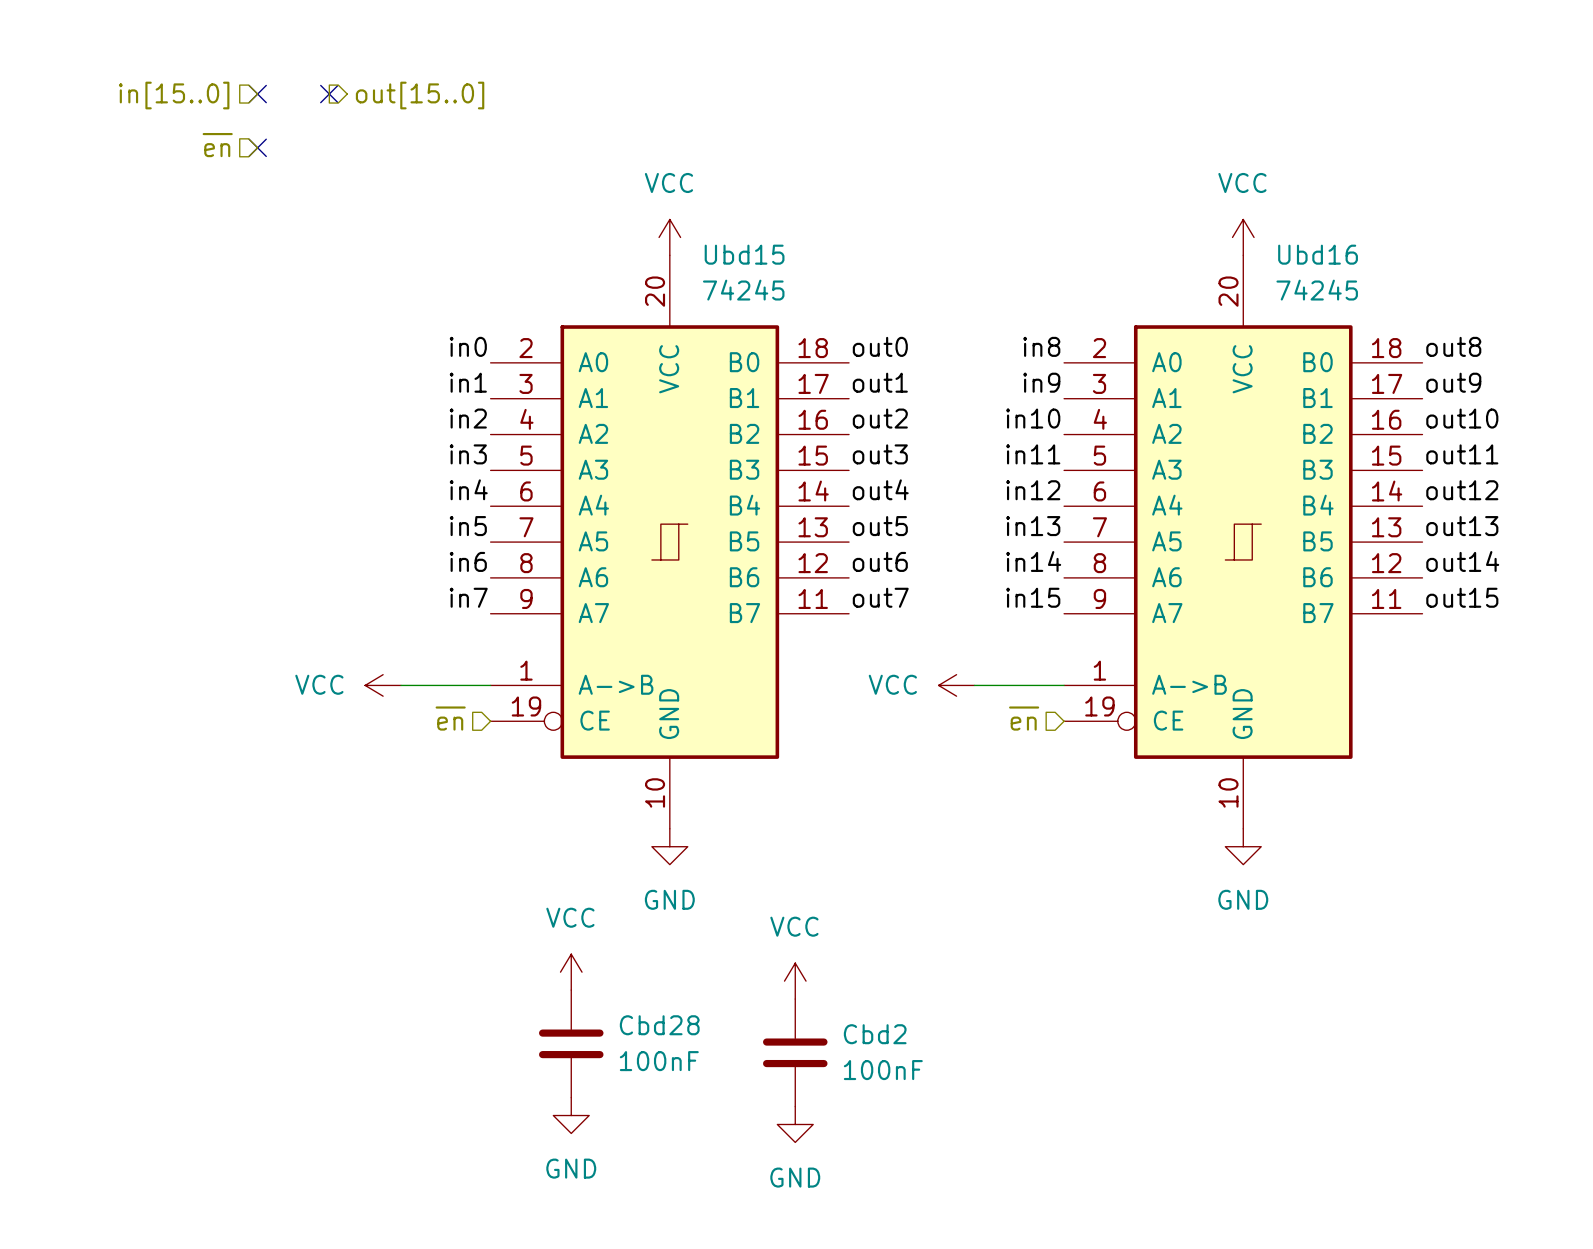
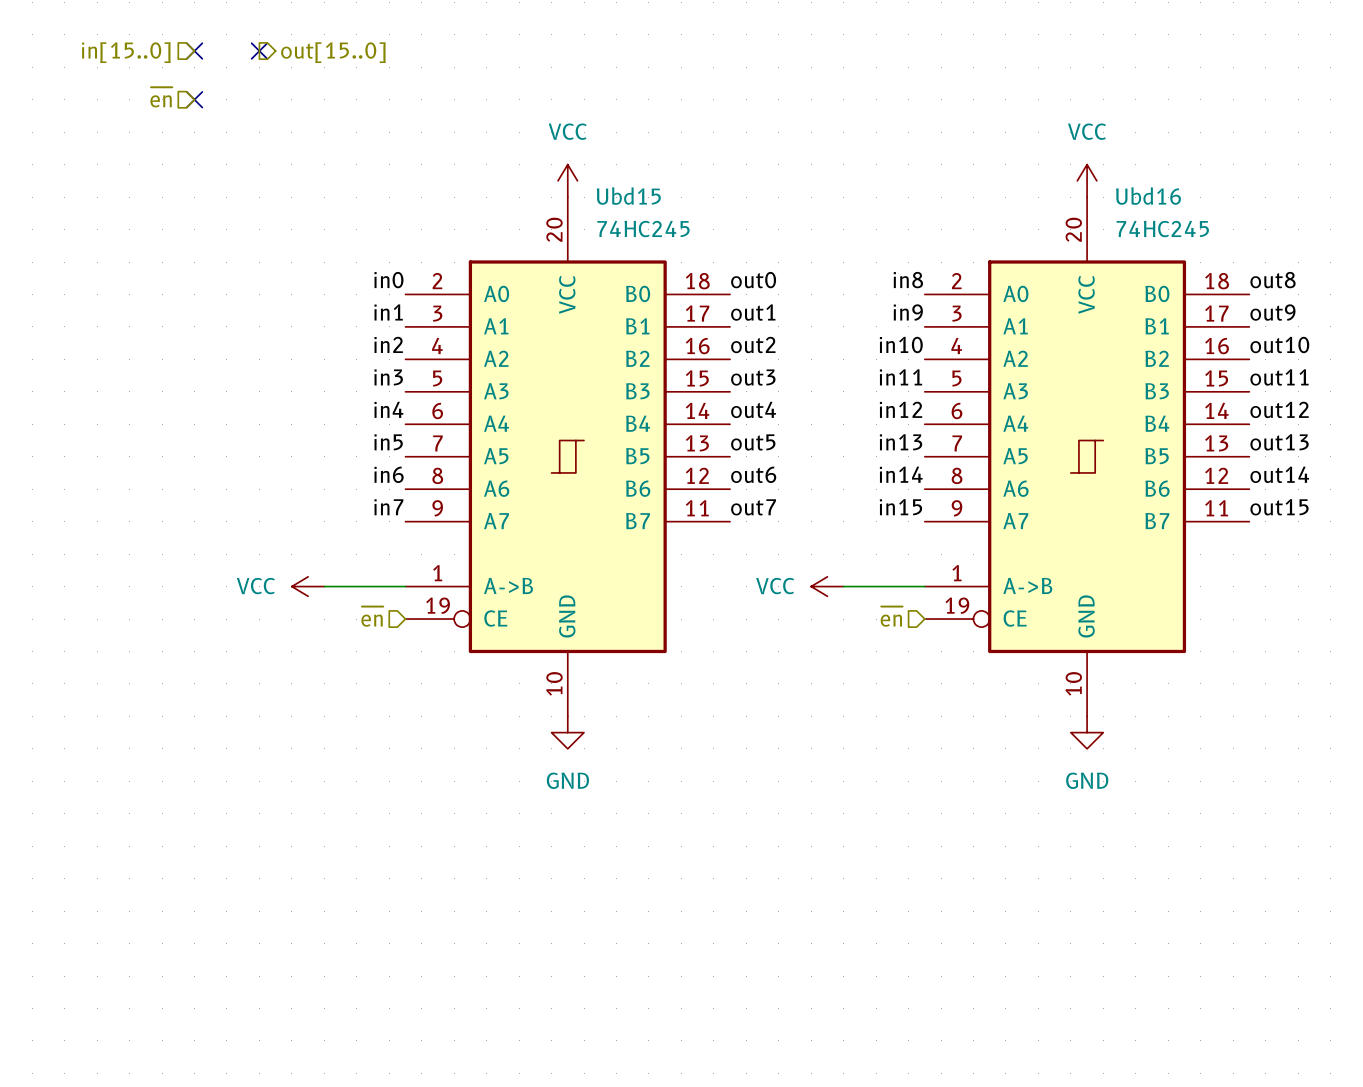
Ubd15 value: 74245 (743, 290) -> 74HC245 (643, 229)
Ubd16 value: 74245 (1317, 290) -> 74HC245 (1162, 229)
power symbol: VCC (571, 972) -> none
power symbol: VCC (795, 981) -> none
Cbd28: 100nF (571, 1043) -> none
Cbd2: 100nF (795, 1052) -> none
power symbol: GND (571, 1115) -> none
power symbol: GND (795, 1124) -> none

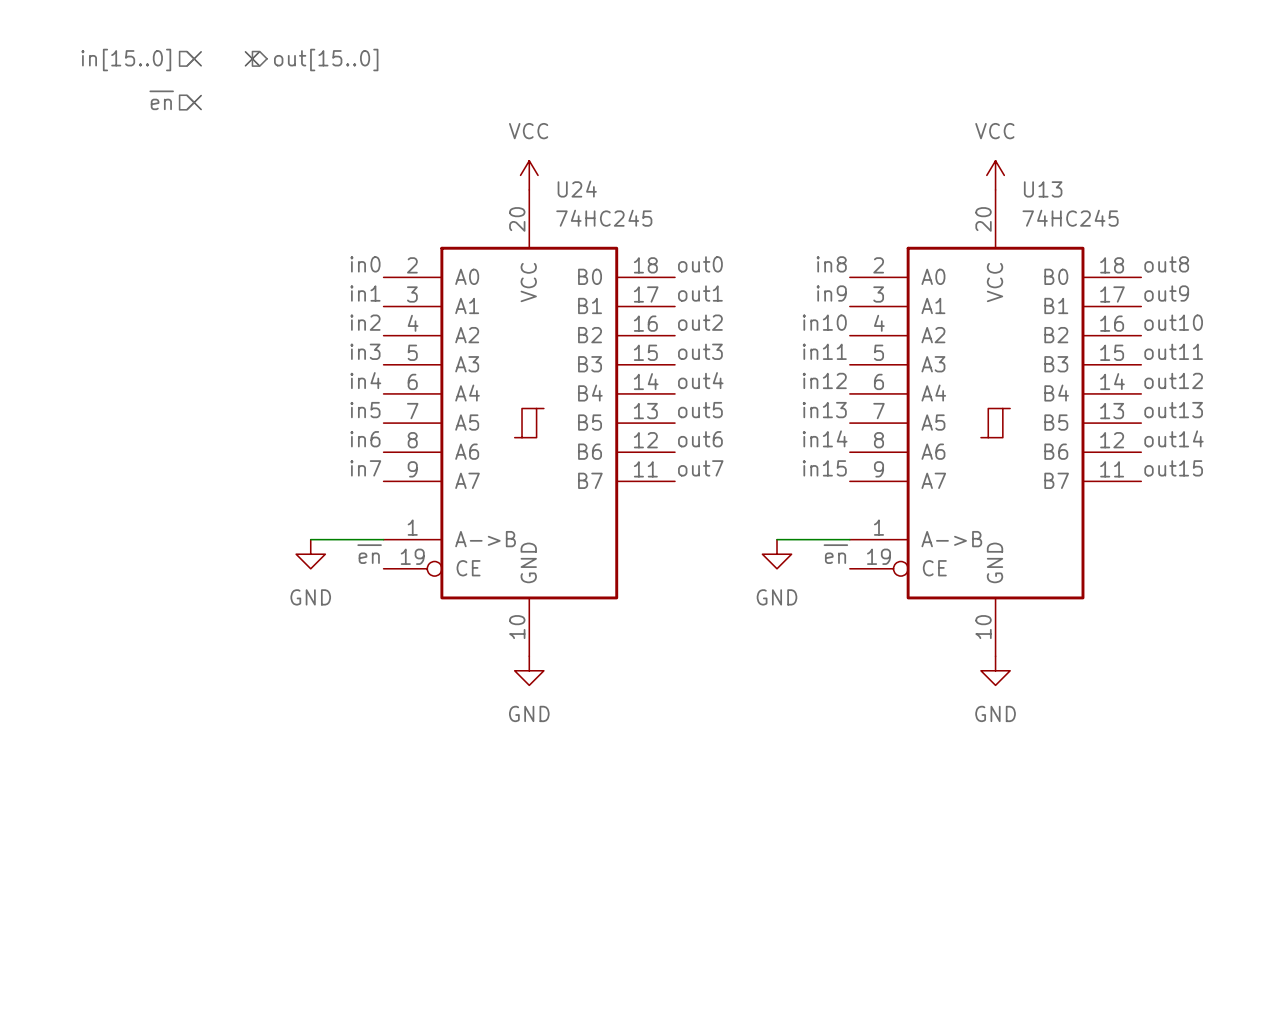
Ubd15 name: Ubd15 (628, 196) -> U24 (577, 189)
Ubd16 name: Ubd16 (1148, 196) -> U13 (1043, 189)
power symbol: VCC (308, 586) -> none
power symbol: VCC (827, 586) -> none
power symbol: none -> GND (310, 554)
label: none -> ~{en} (369, 554)
power symbol: none -> GND (777, 554)
label: none -> ~{en} (835, 554)
hierarchical label: ~{en} (372, 616) -> none
hierarchical label: ~{en} (891, 616) -> none

